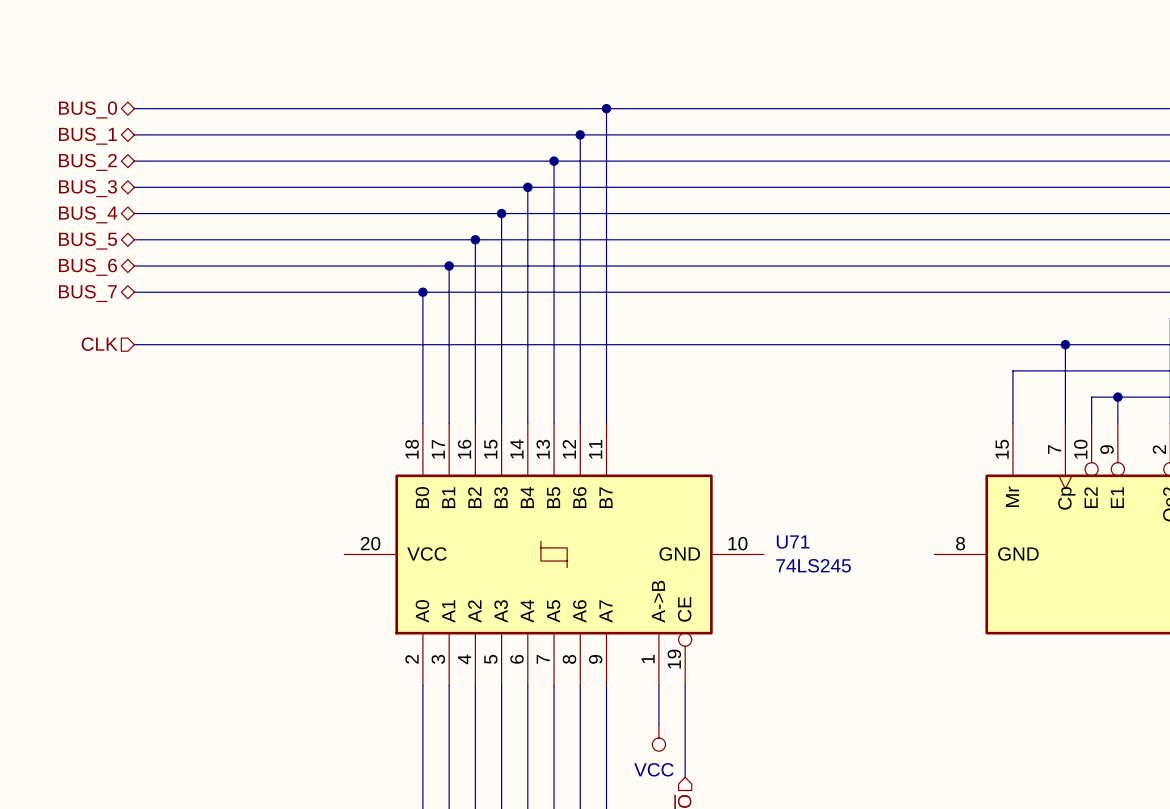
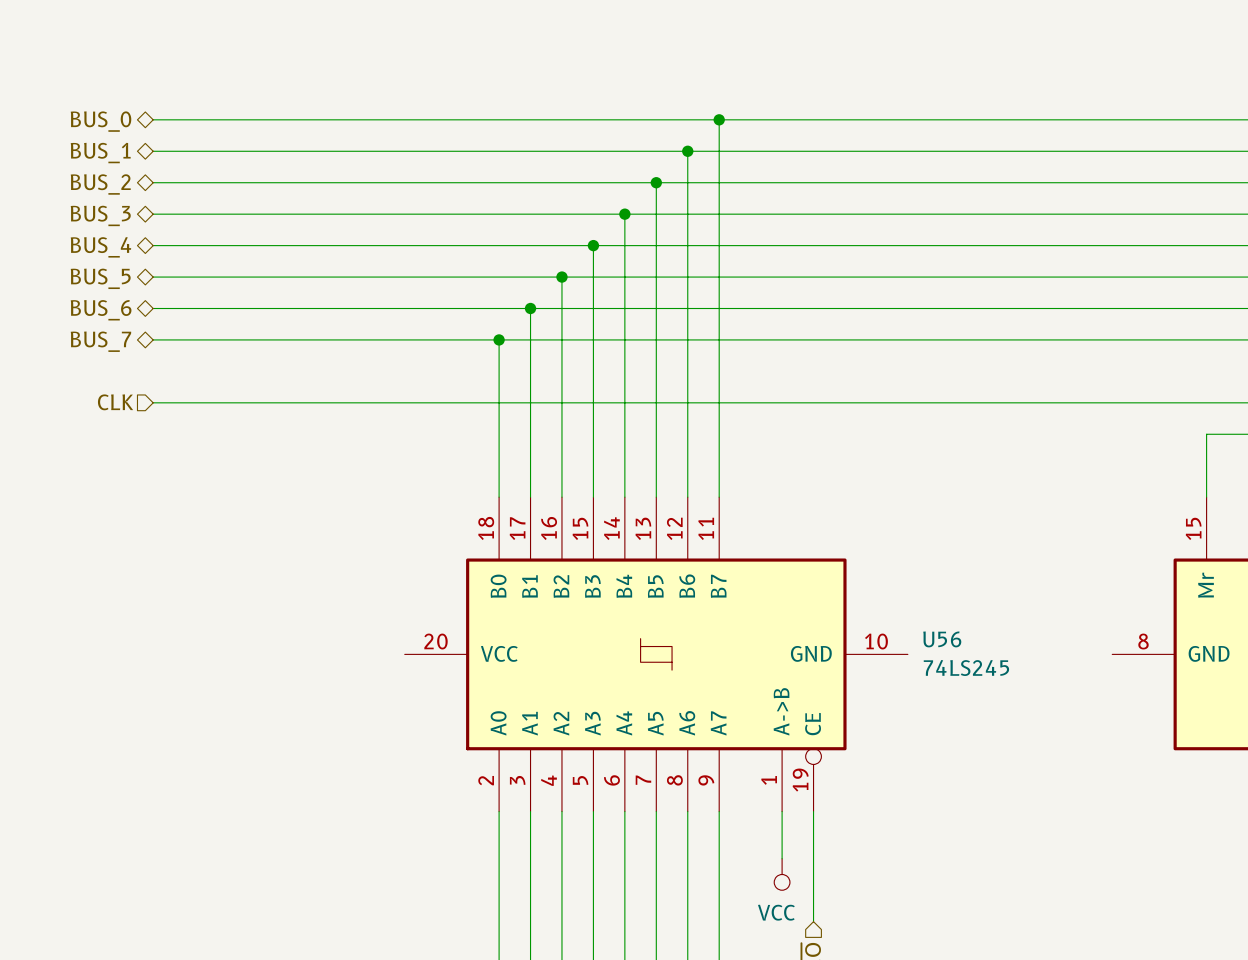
U71 name: U71 (793, 542) -> U56 (942, 639)

